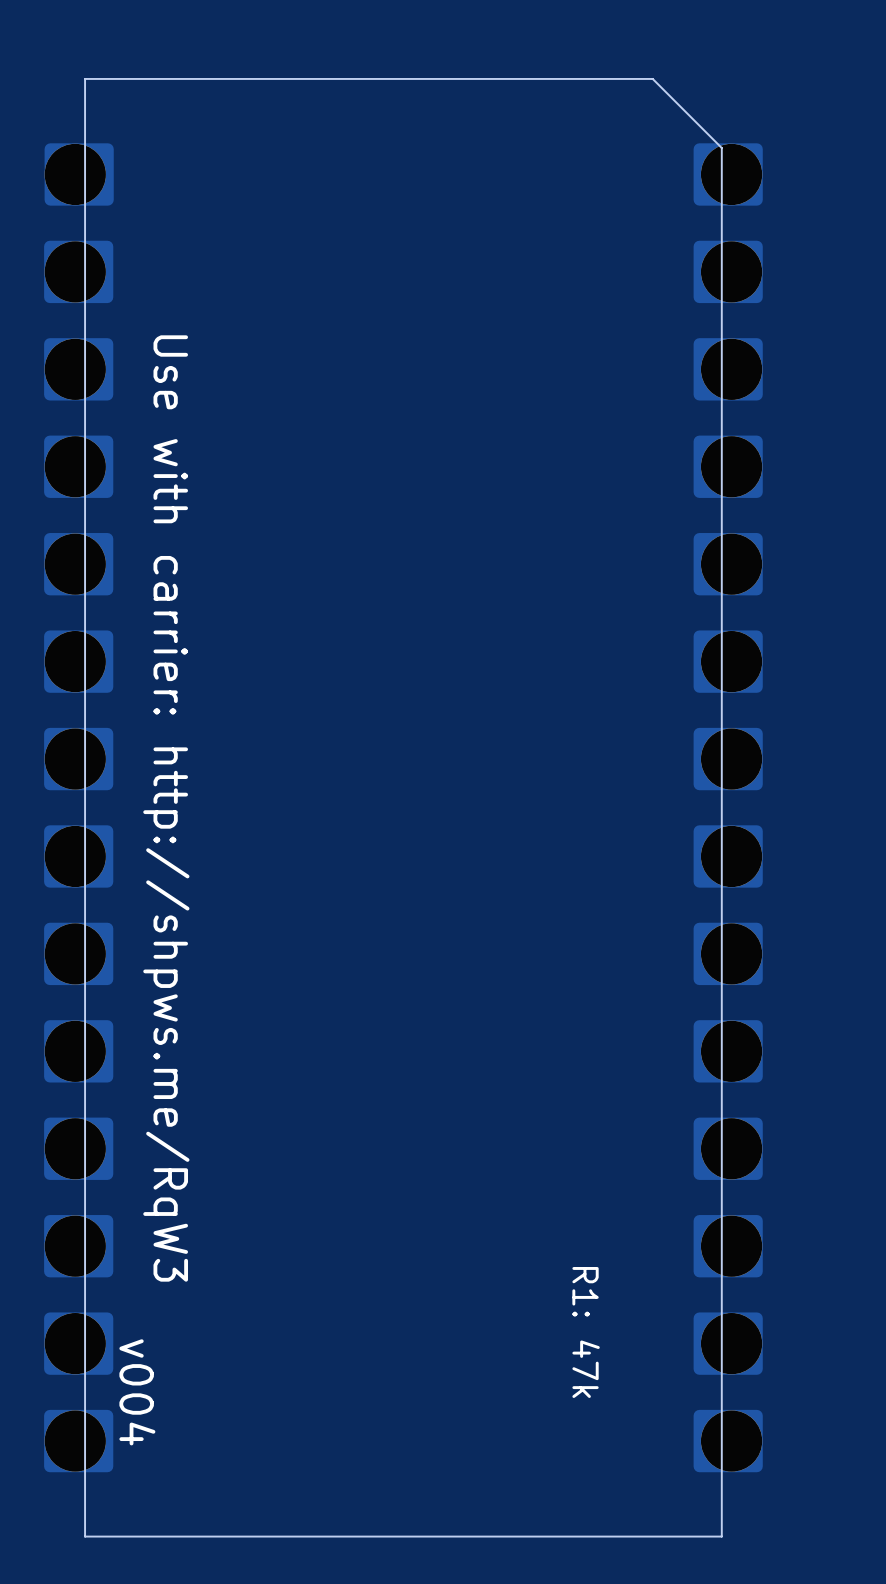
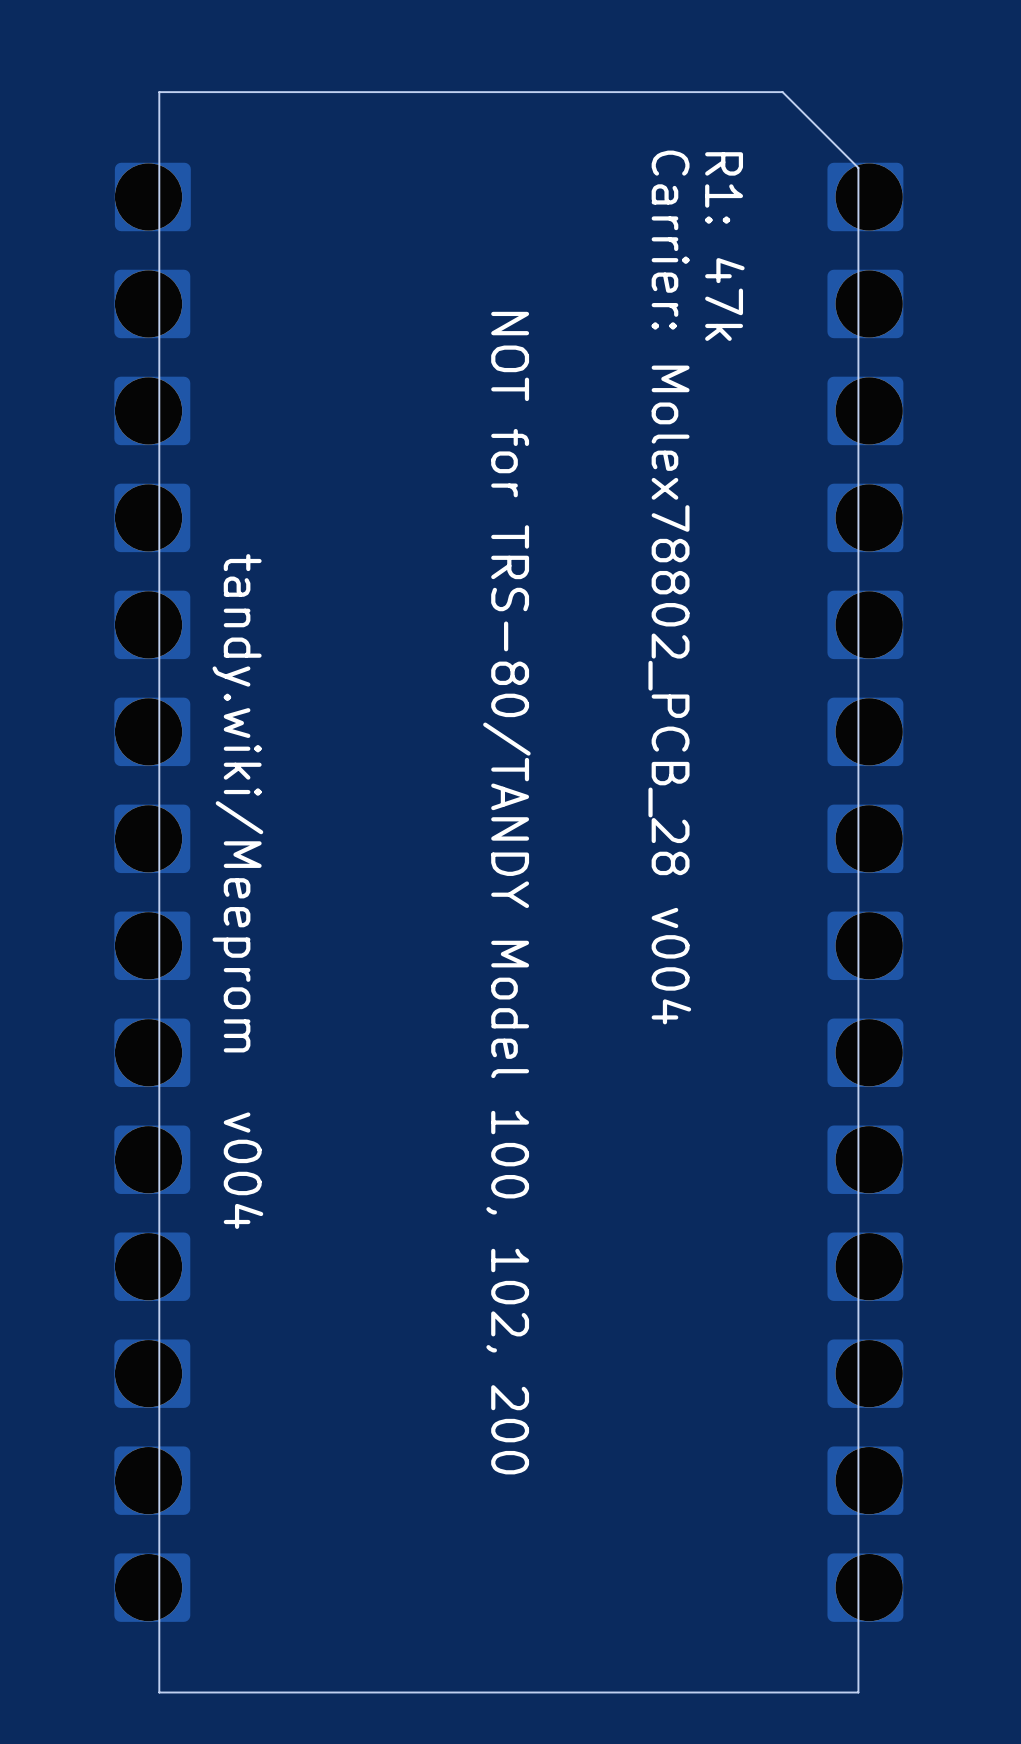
text: none -> R1: 47k (724, 246)
text: none -> Carrier: Molex78802_PCB_28 v004 (669, 587)
text: Use with carrier: http://shpws.me/RqW3 (166, 808) -> tandy.wiki/Meeprom v004 (237, 891)
text: none -> NOT for TRS-80/TANDY Model 100, 102, 200 (506, 893)
text: R1: 47k (586, 1332) -> none
text: v004 (137, 1392) -> none

